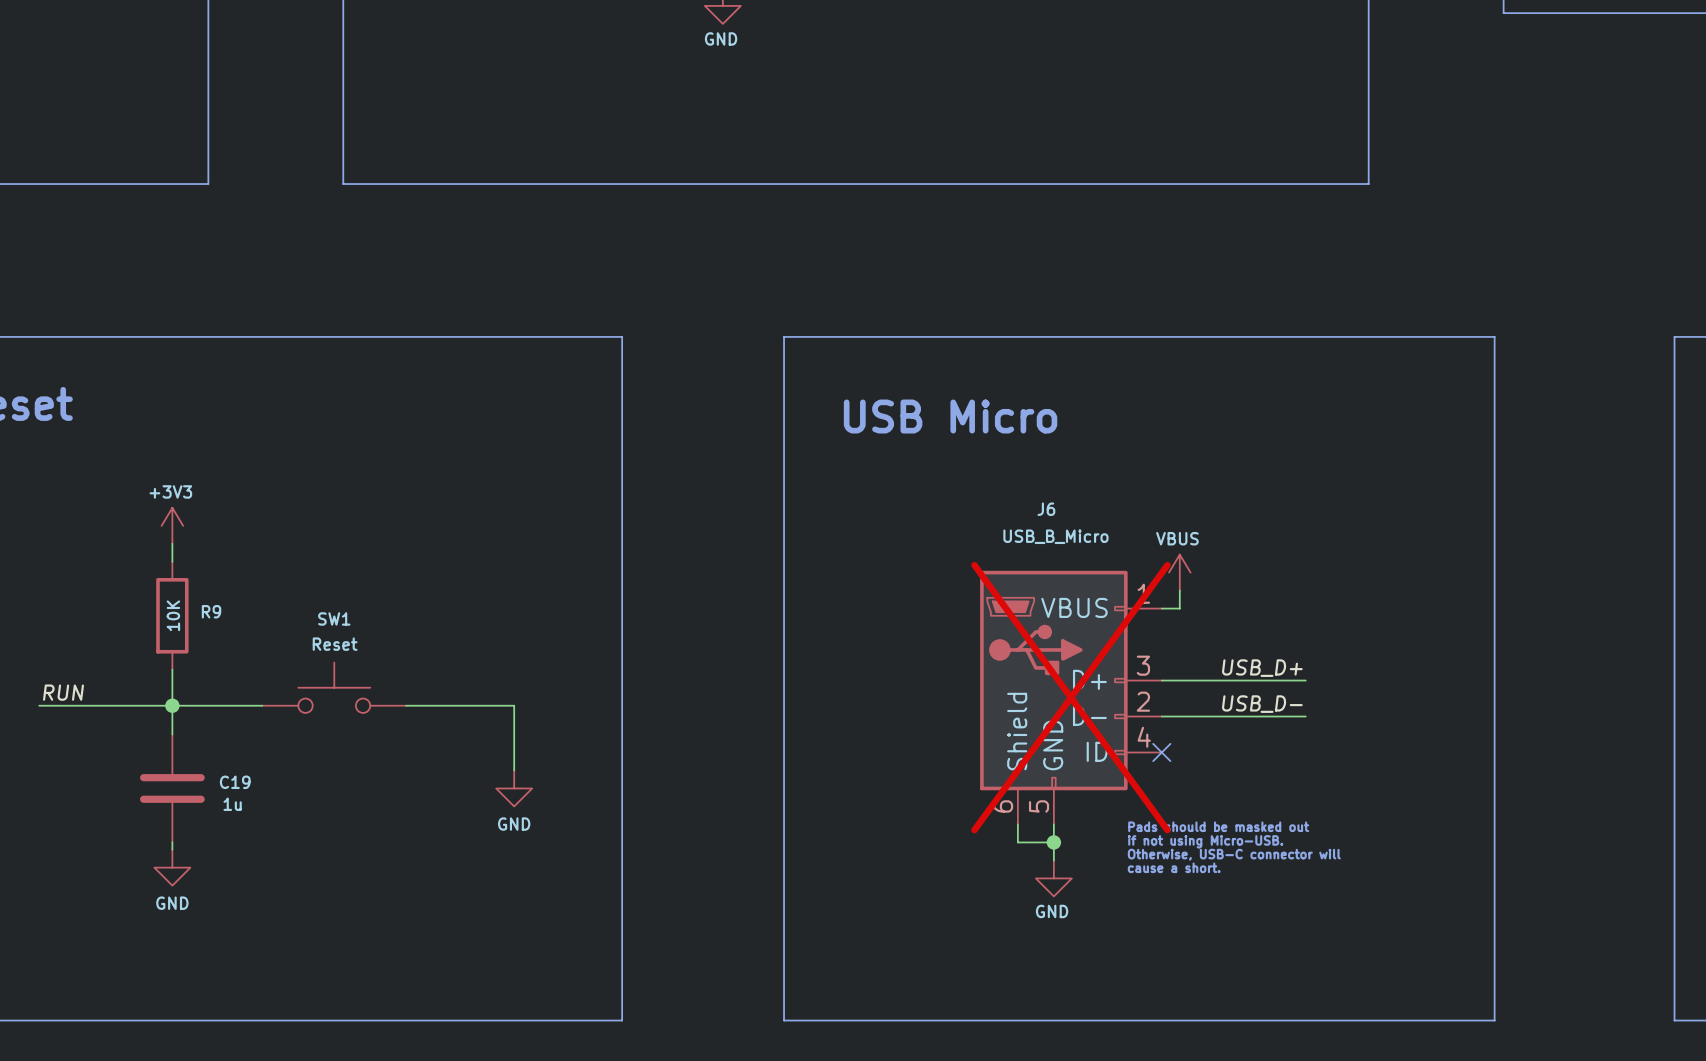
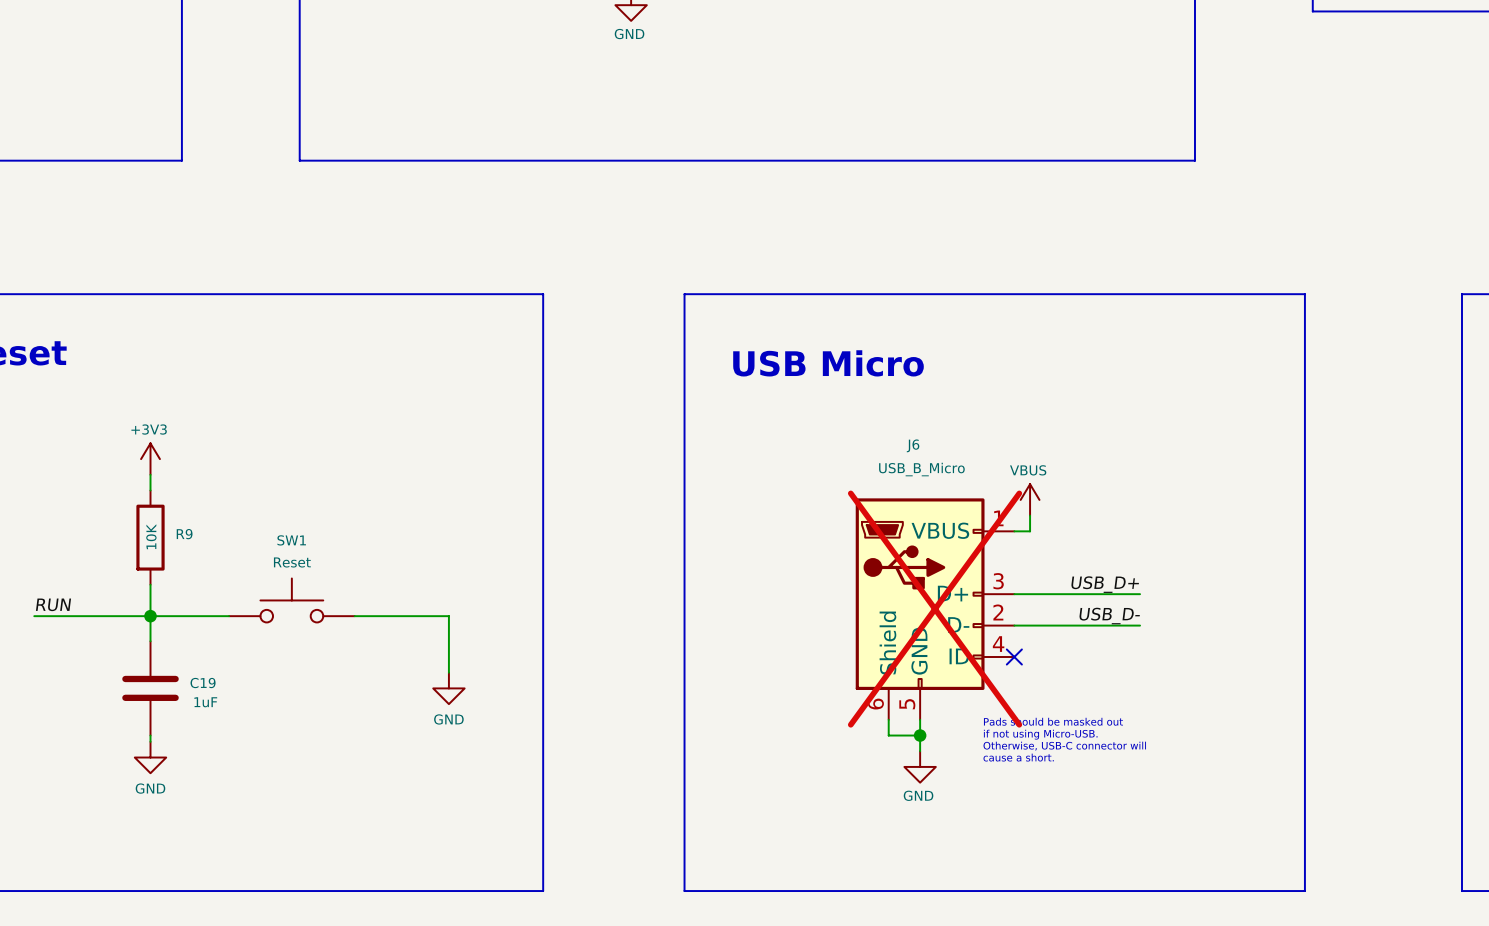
C19 value: 1u (232, 804) -> 1uF (205, 702)

